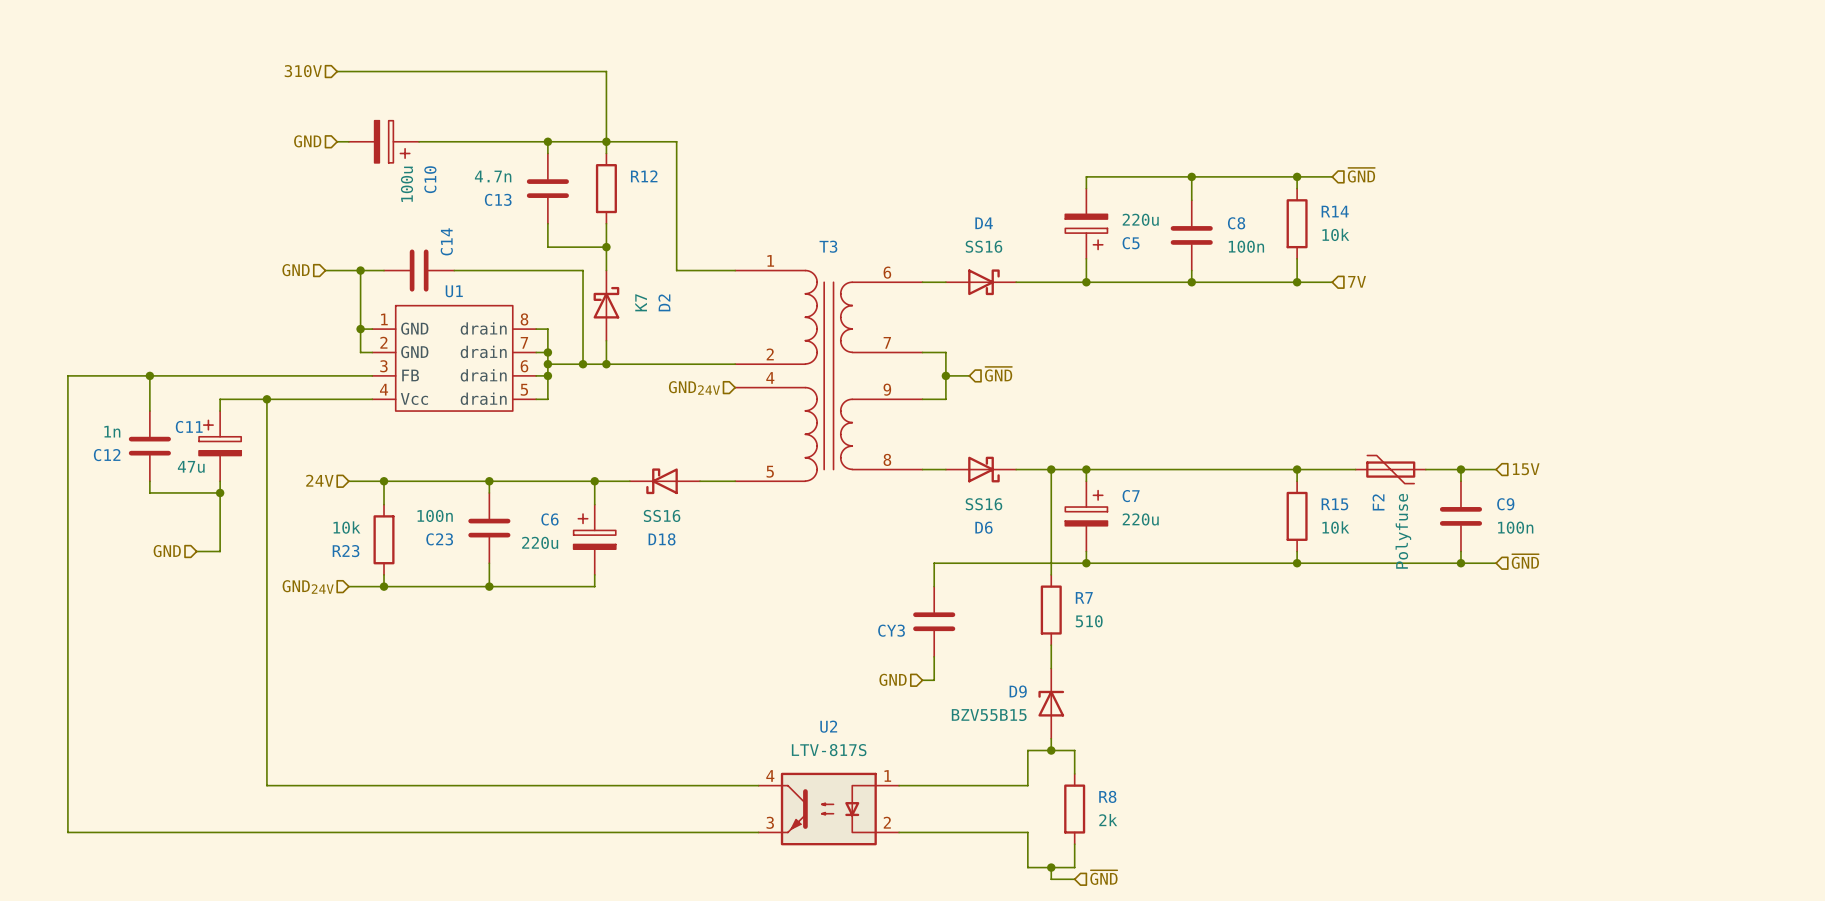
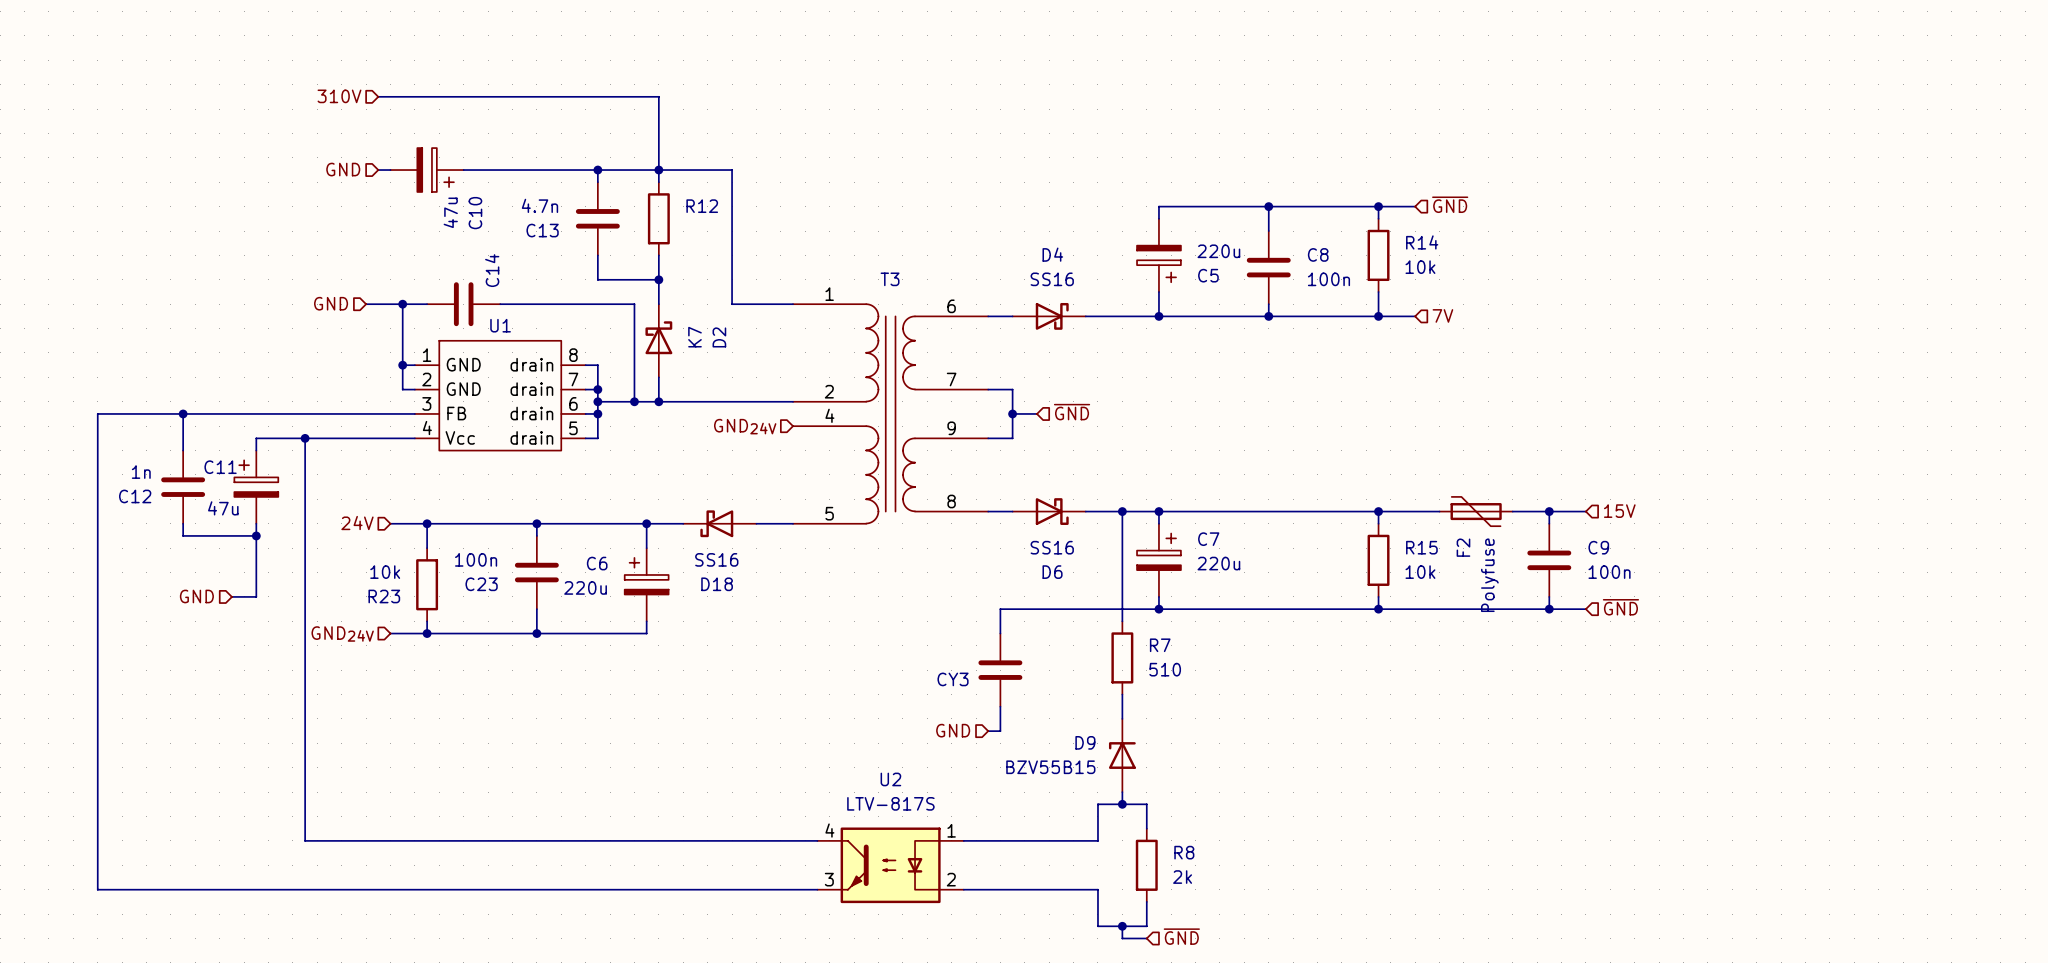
C10 value: 100u (406, 184) -> 47u (450, 212)

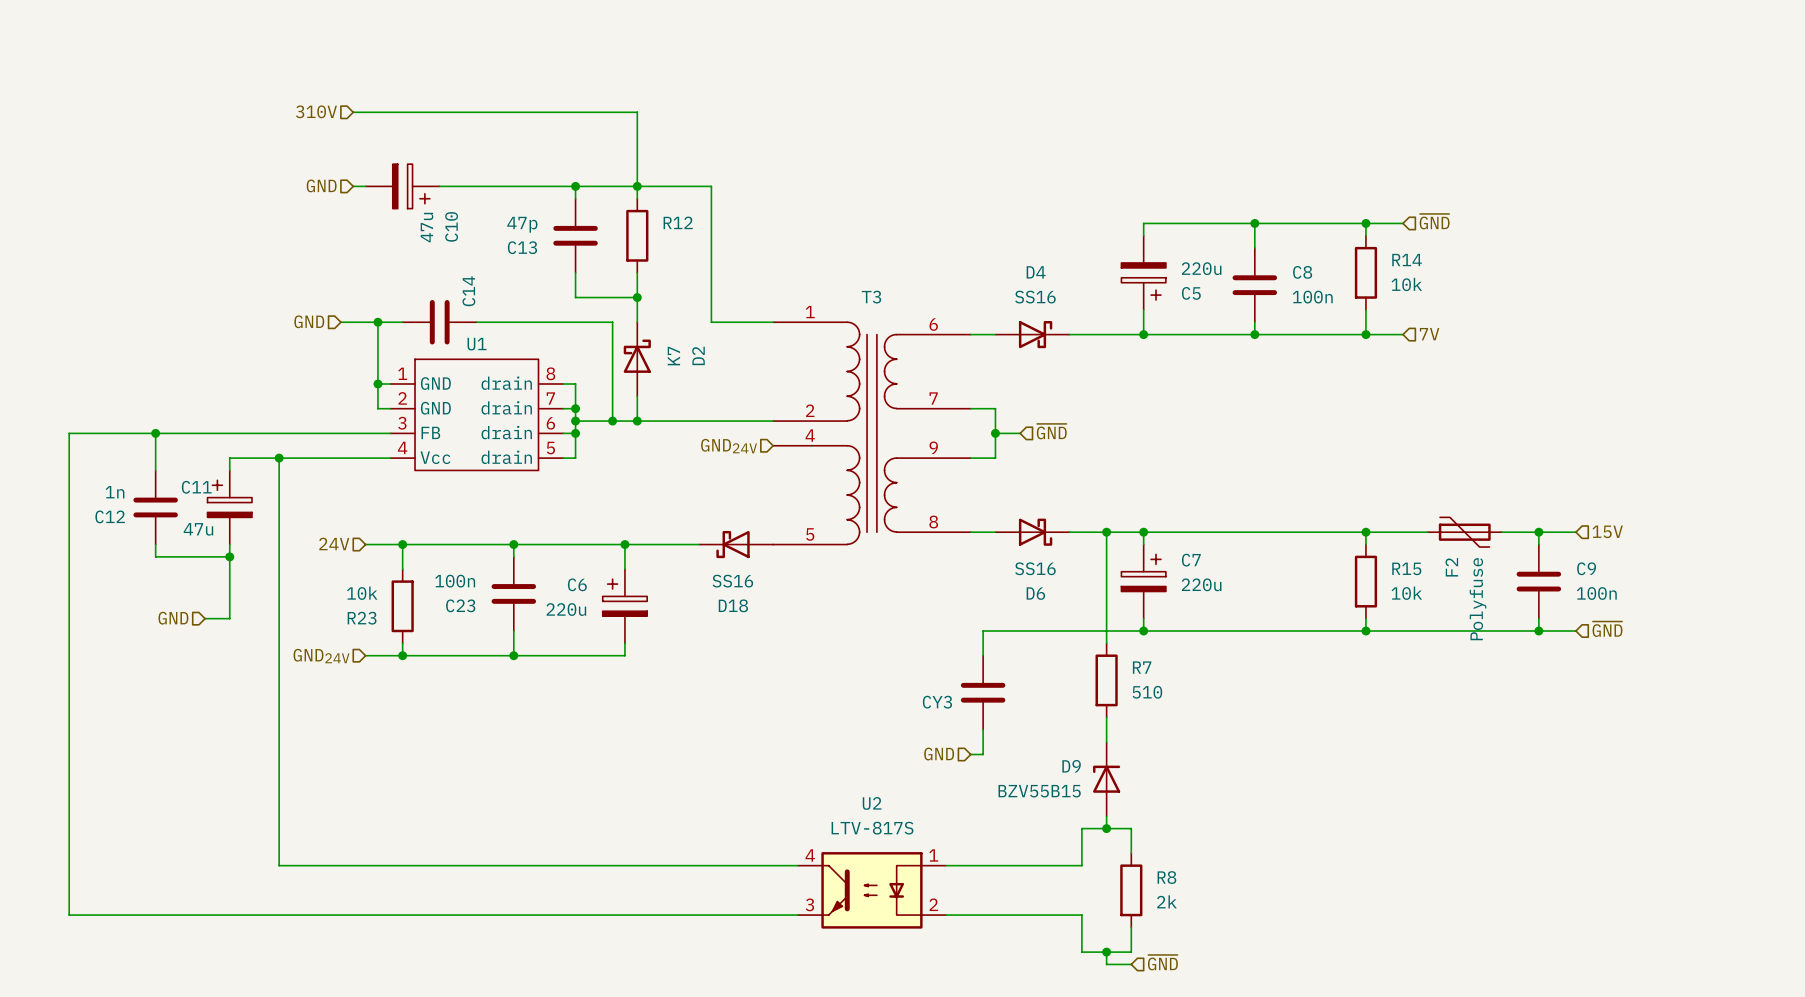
C13 value: 4.7n (539, 205) -> 47p (522, 224)
D18 position: (719, 523) -> (736, 544)

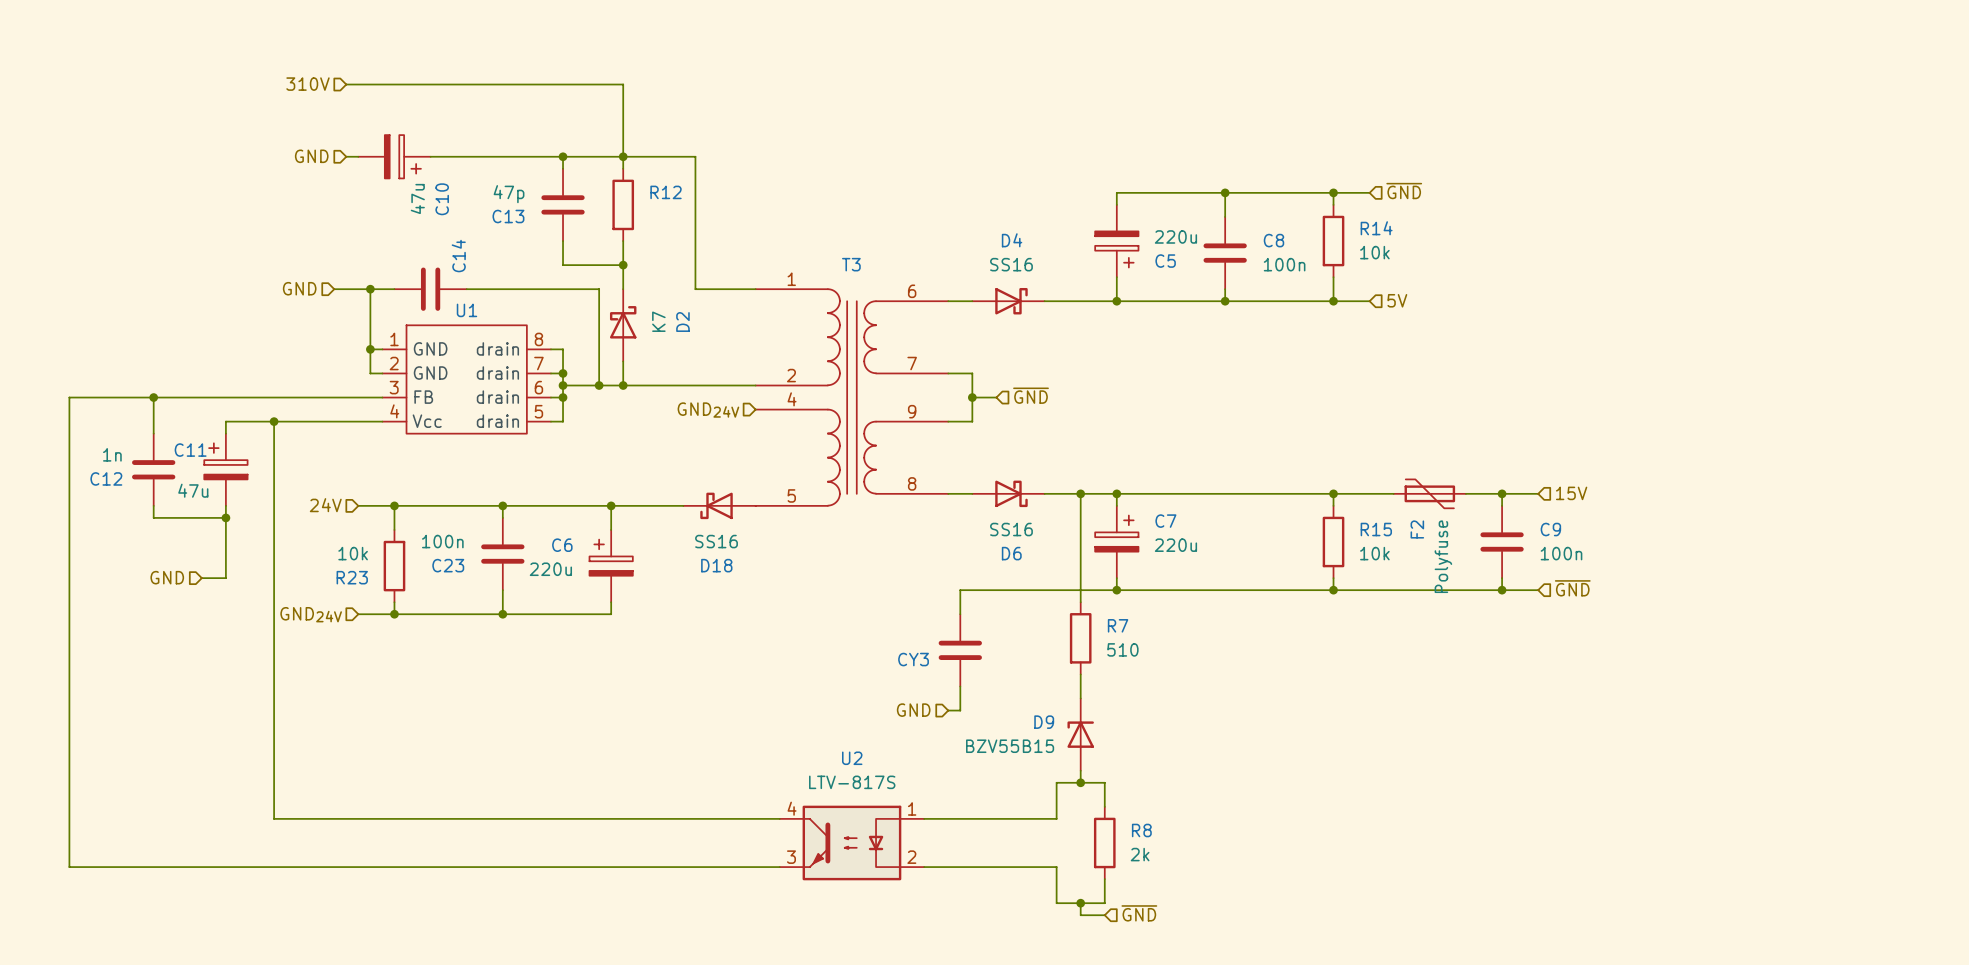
hierarchical label: 7V (1429, 334) -> 5V (1397, 300)

